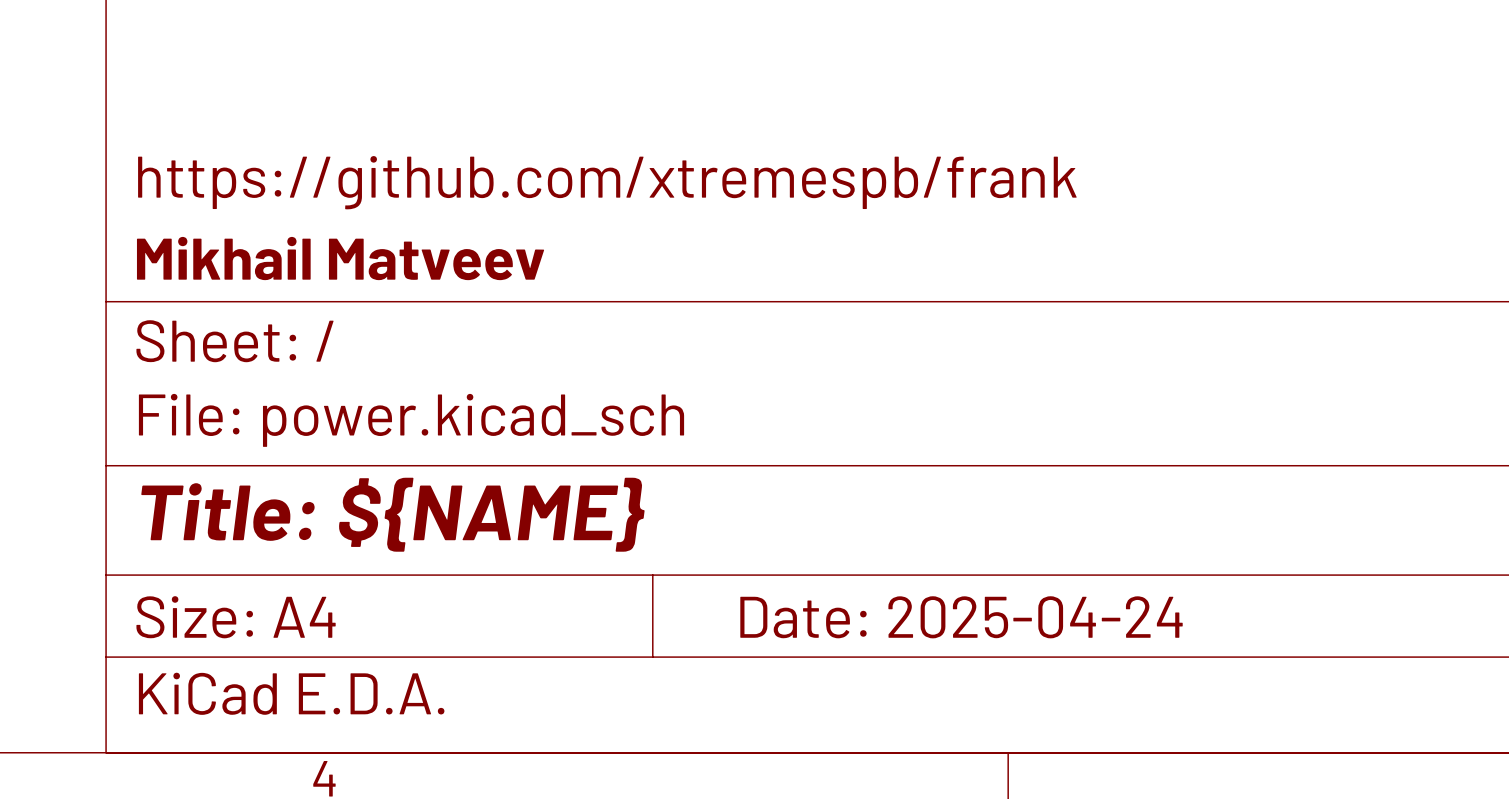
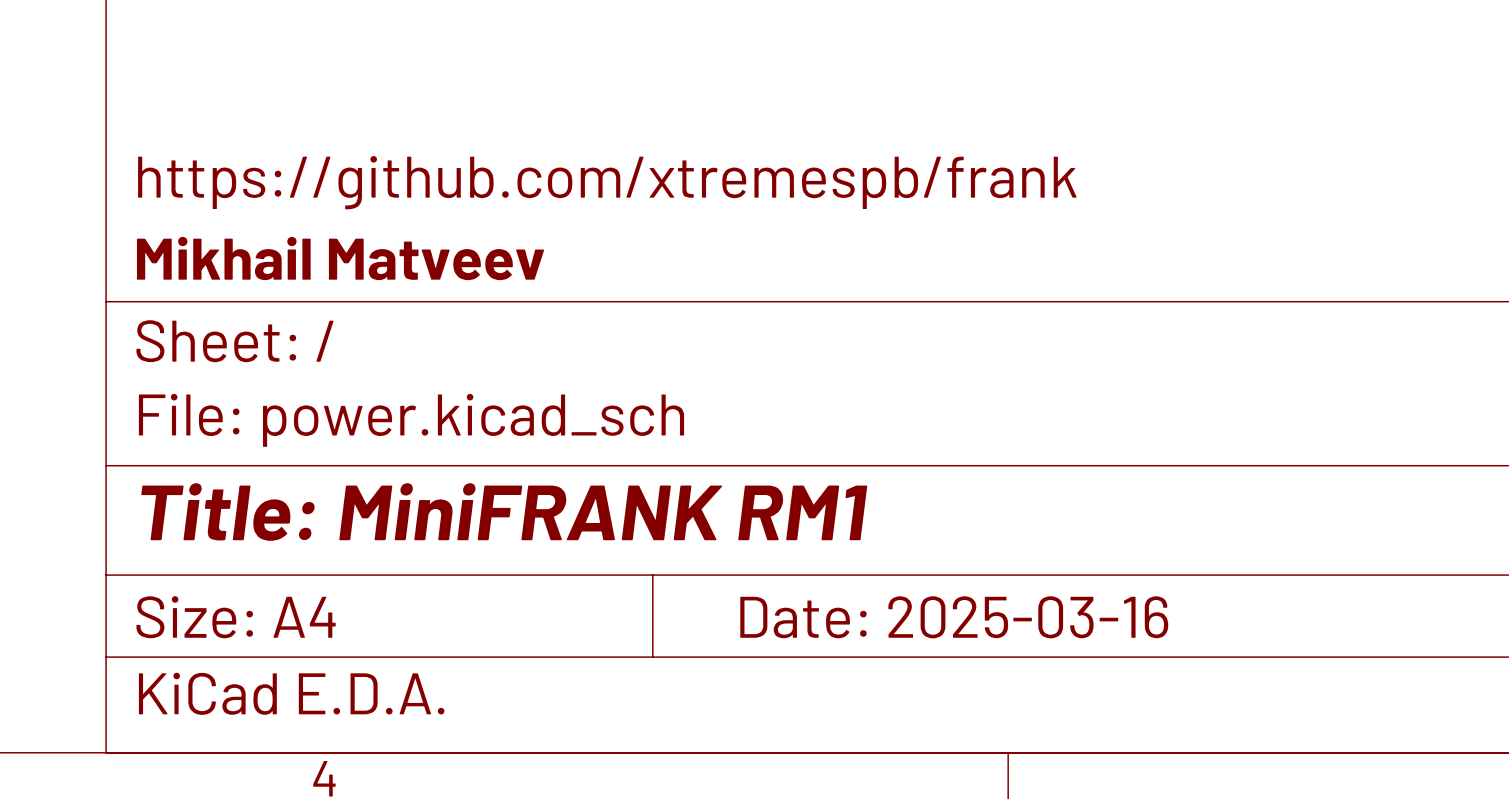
title block: Title: ${NAME} (392, 514) -> Title: MiniFRANK RM1 (504, 512)
title block: Date: 2025-04-24 (961, 617) -> Date: 2025-03-16 (954, 617)

